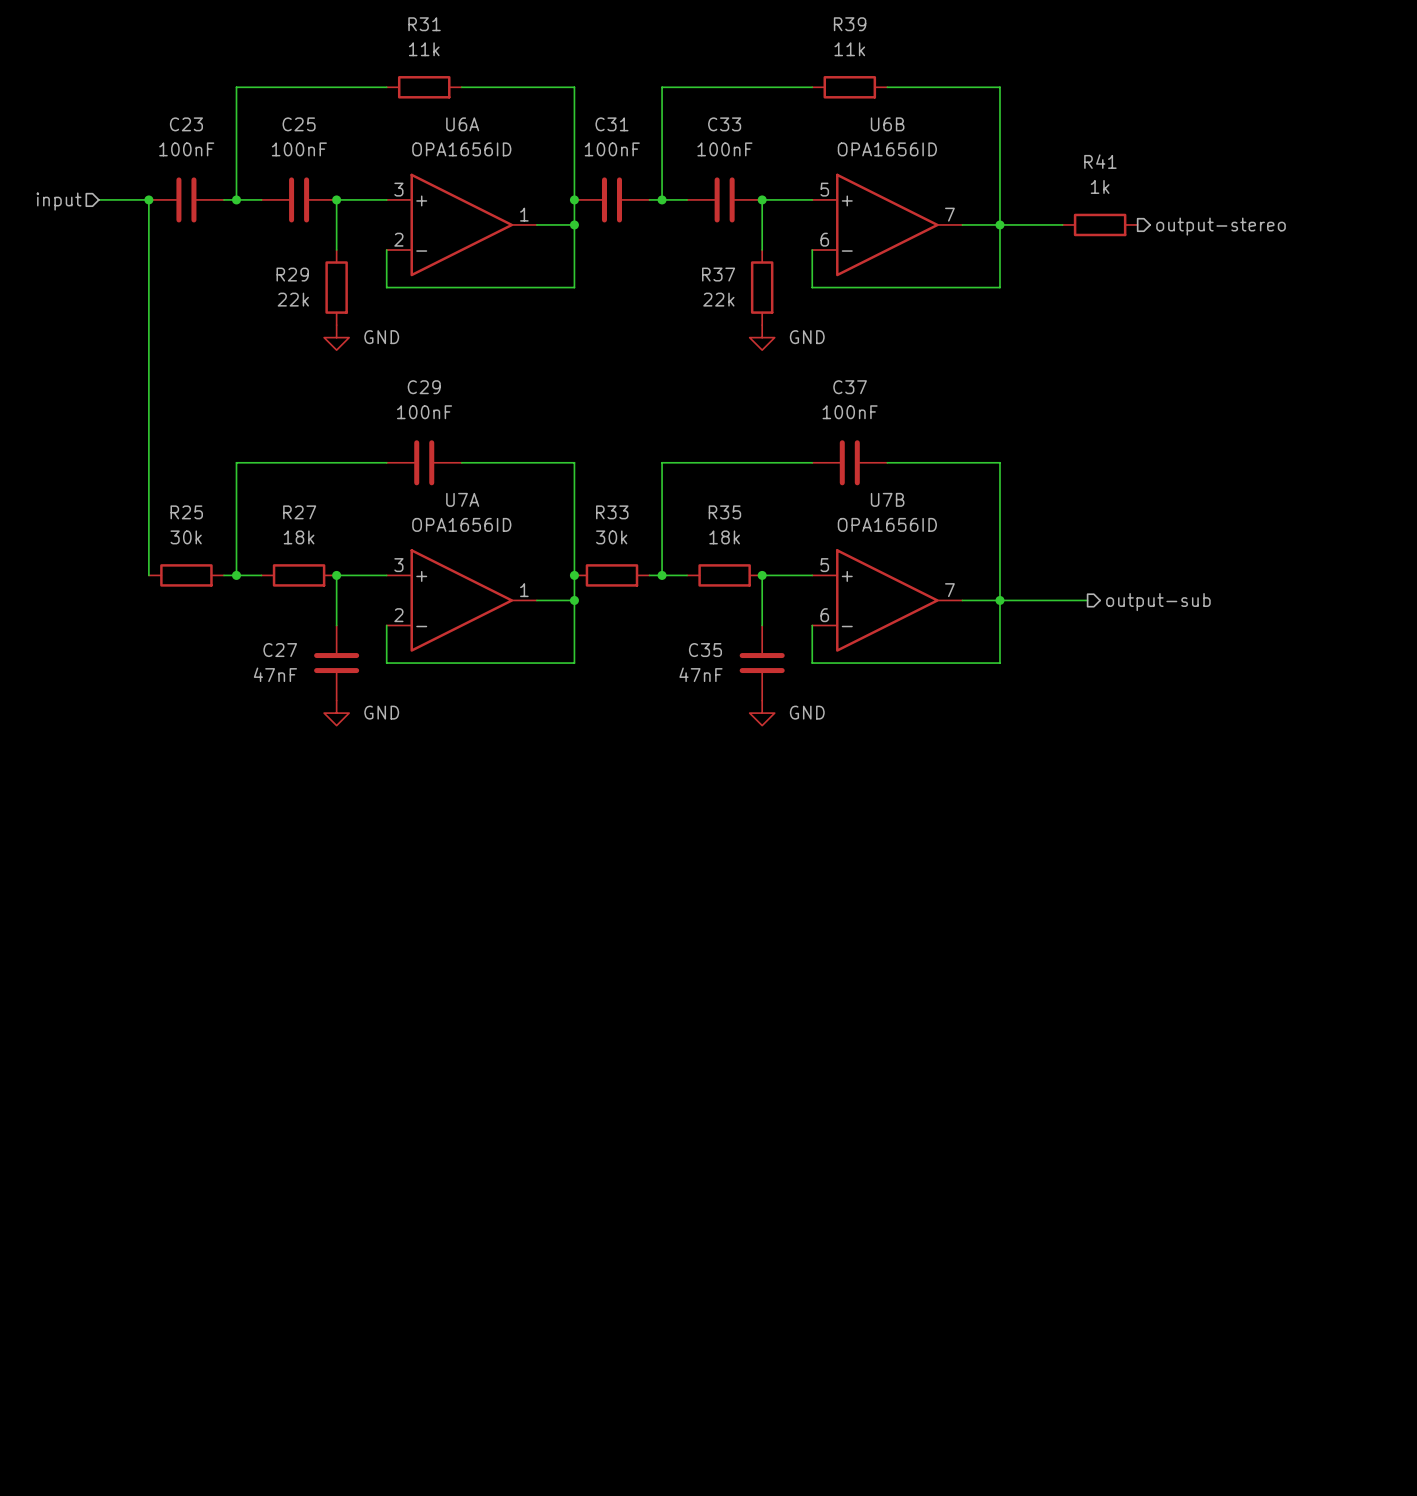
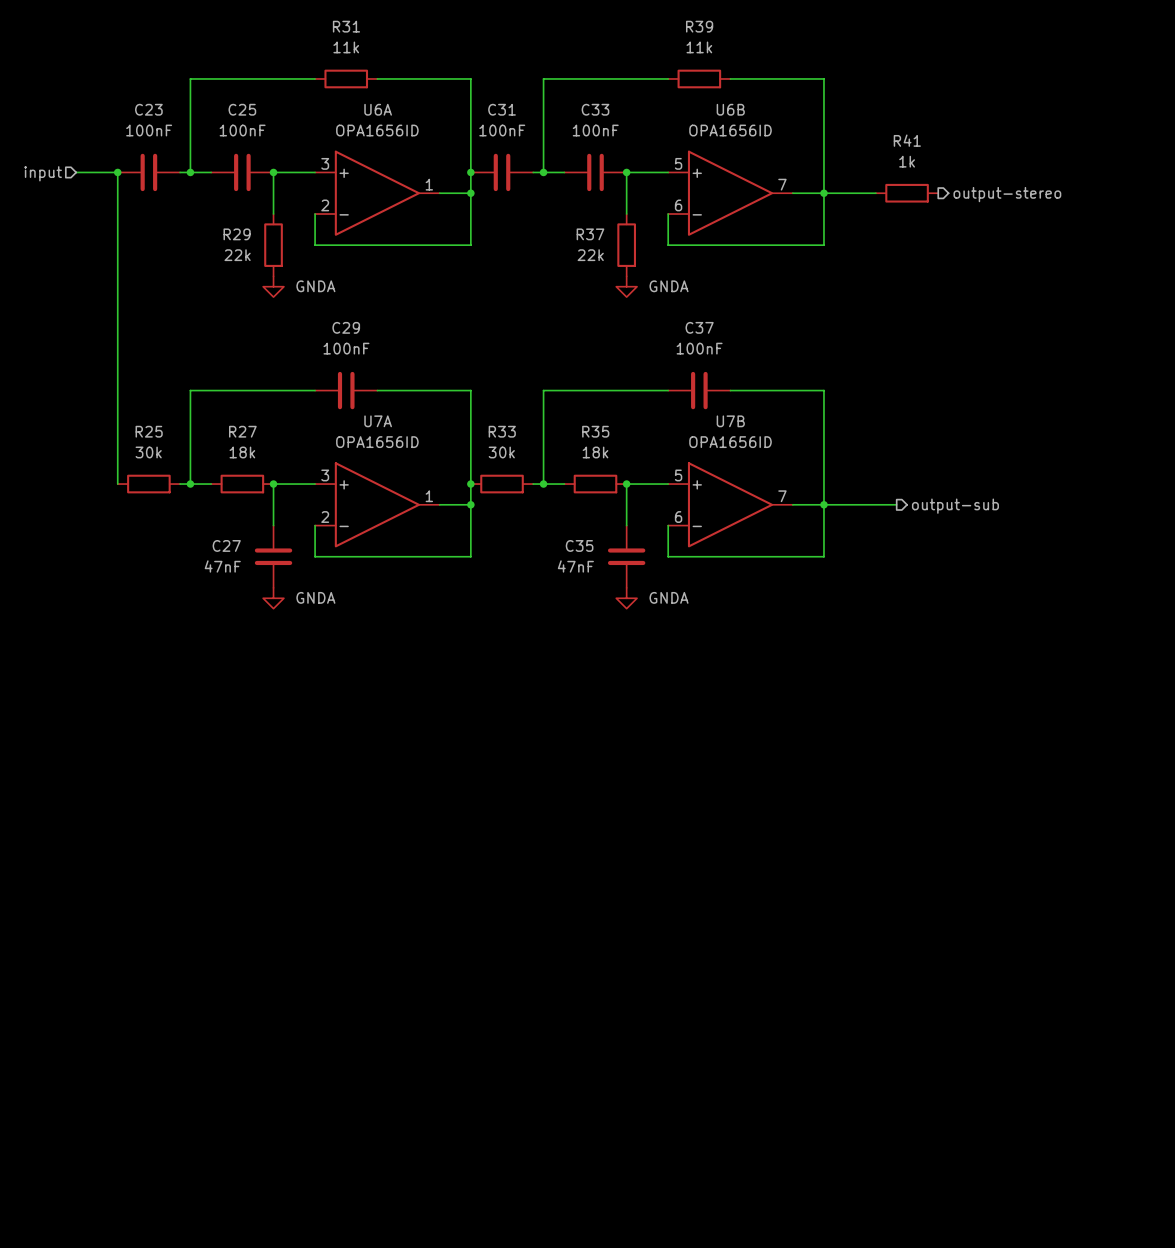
power symbol: GND (336, 337) -> GNDA (273, 286)
power symbol: GND (762, 337) -> GNDA (626, 286)
power symbol: GND (336, 713) -> GNDA (273, 598)
power symbol: GND (762, 713) -> GNDA (626, 598)

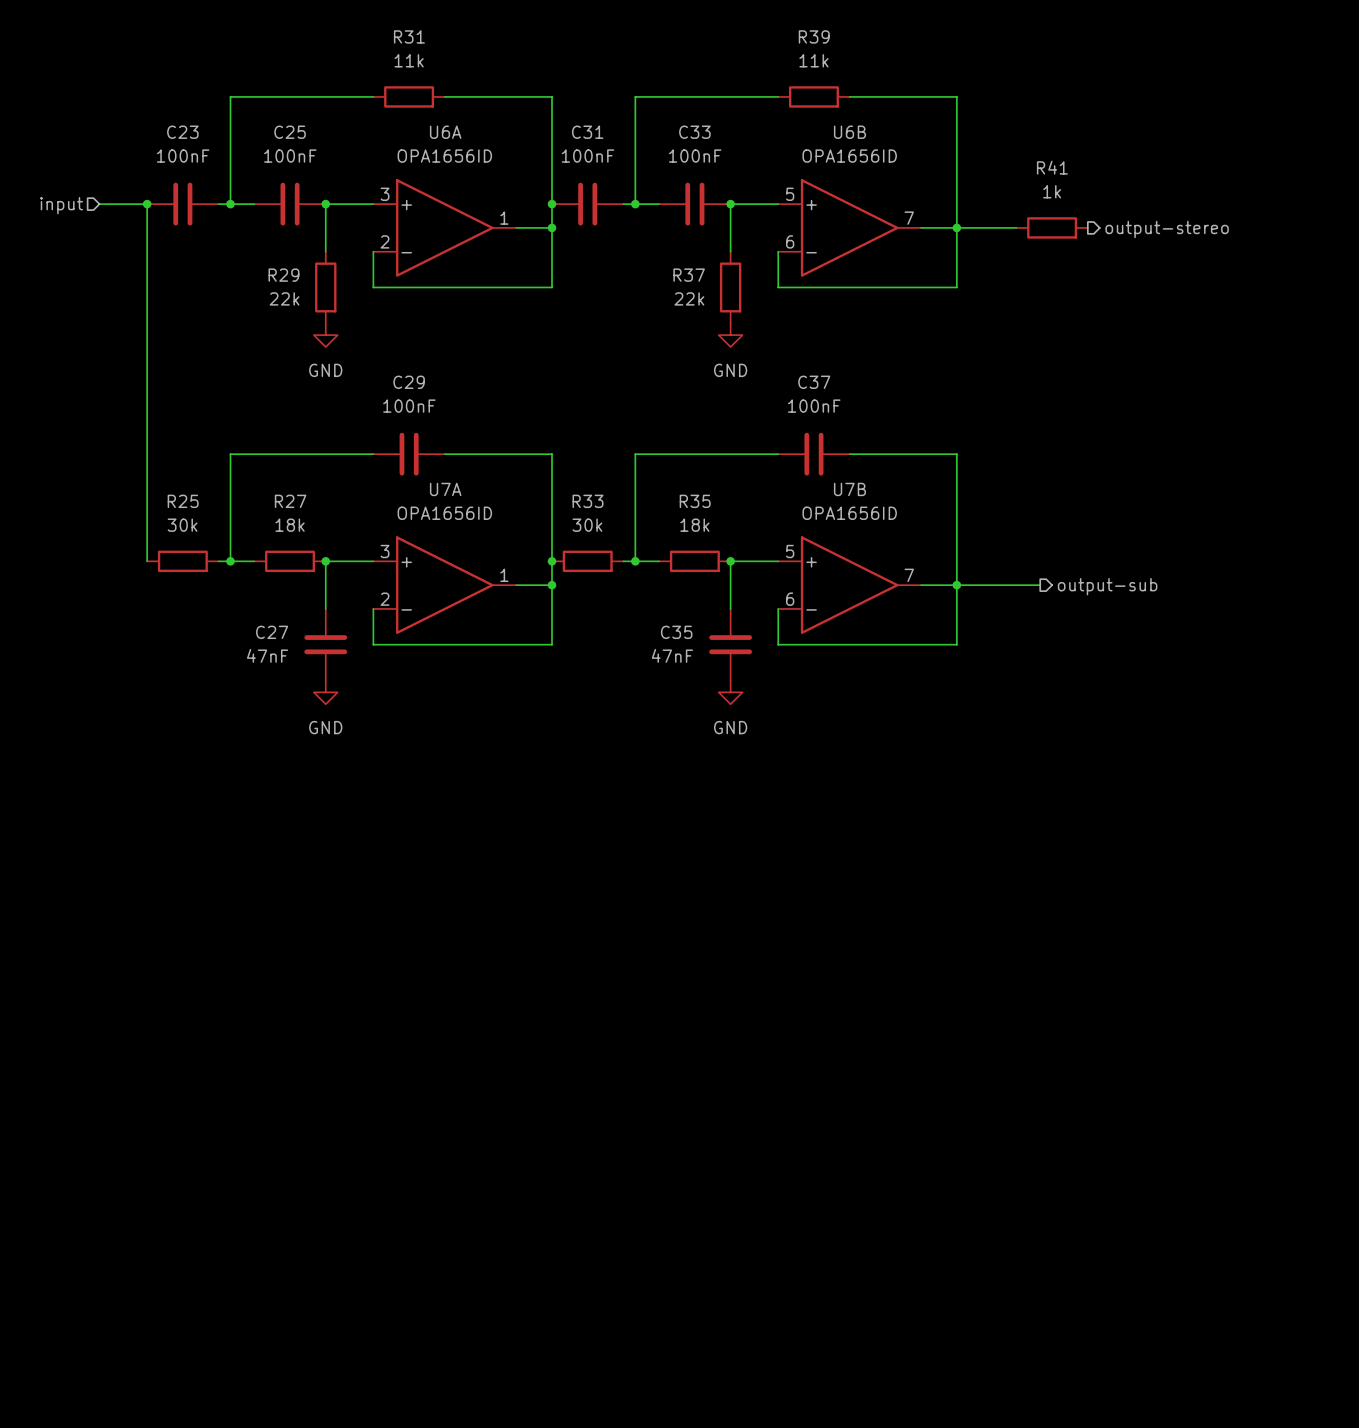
power symbol: GNDA (273, 286) -> GND (325, 335)
power symbol: GNDA (626, 286) -> GND (730, 335)
power symbol: GNDA (273, 598) -> GND (325, 692)
power symbol: GNDA (626, 598) -> GND (730, 692)

